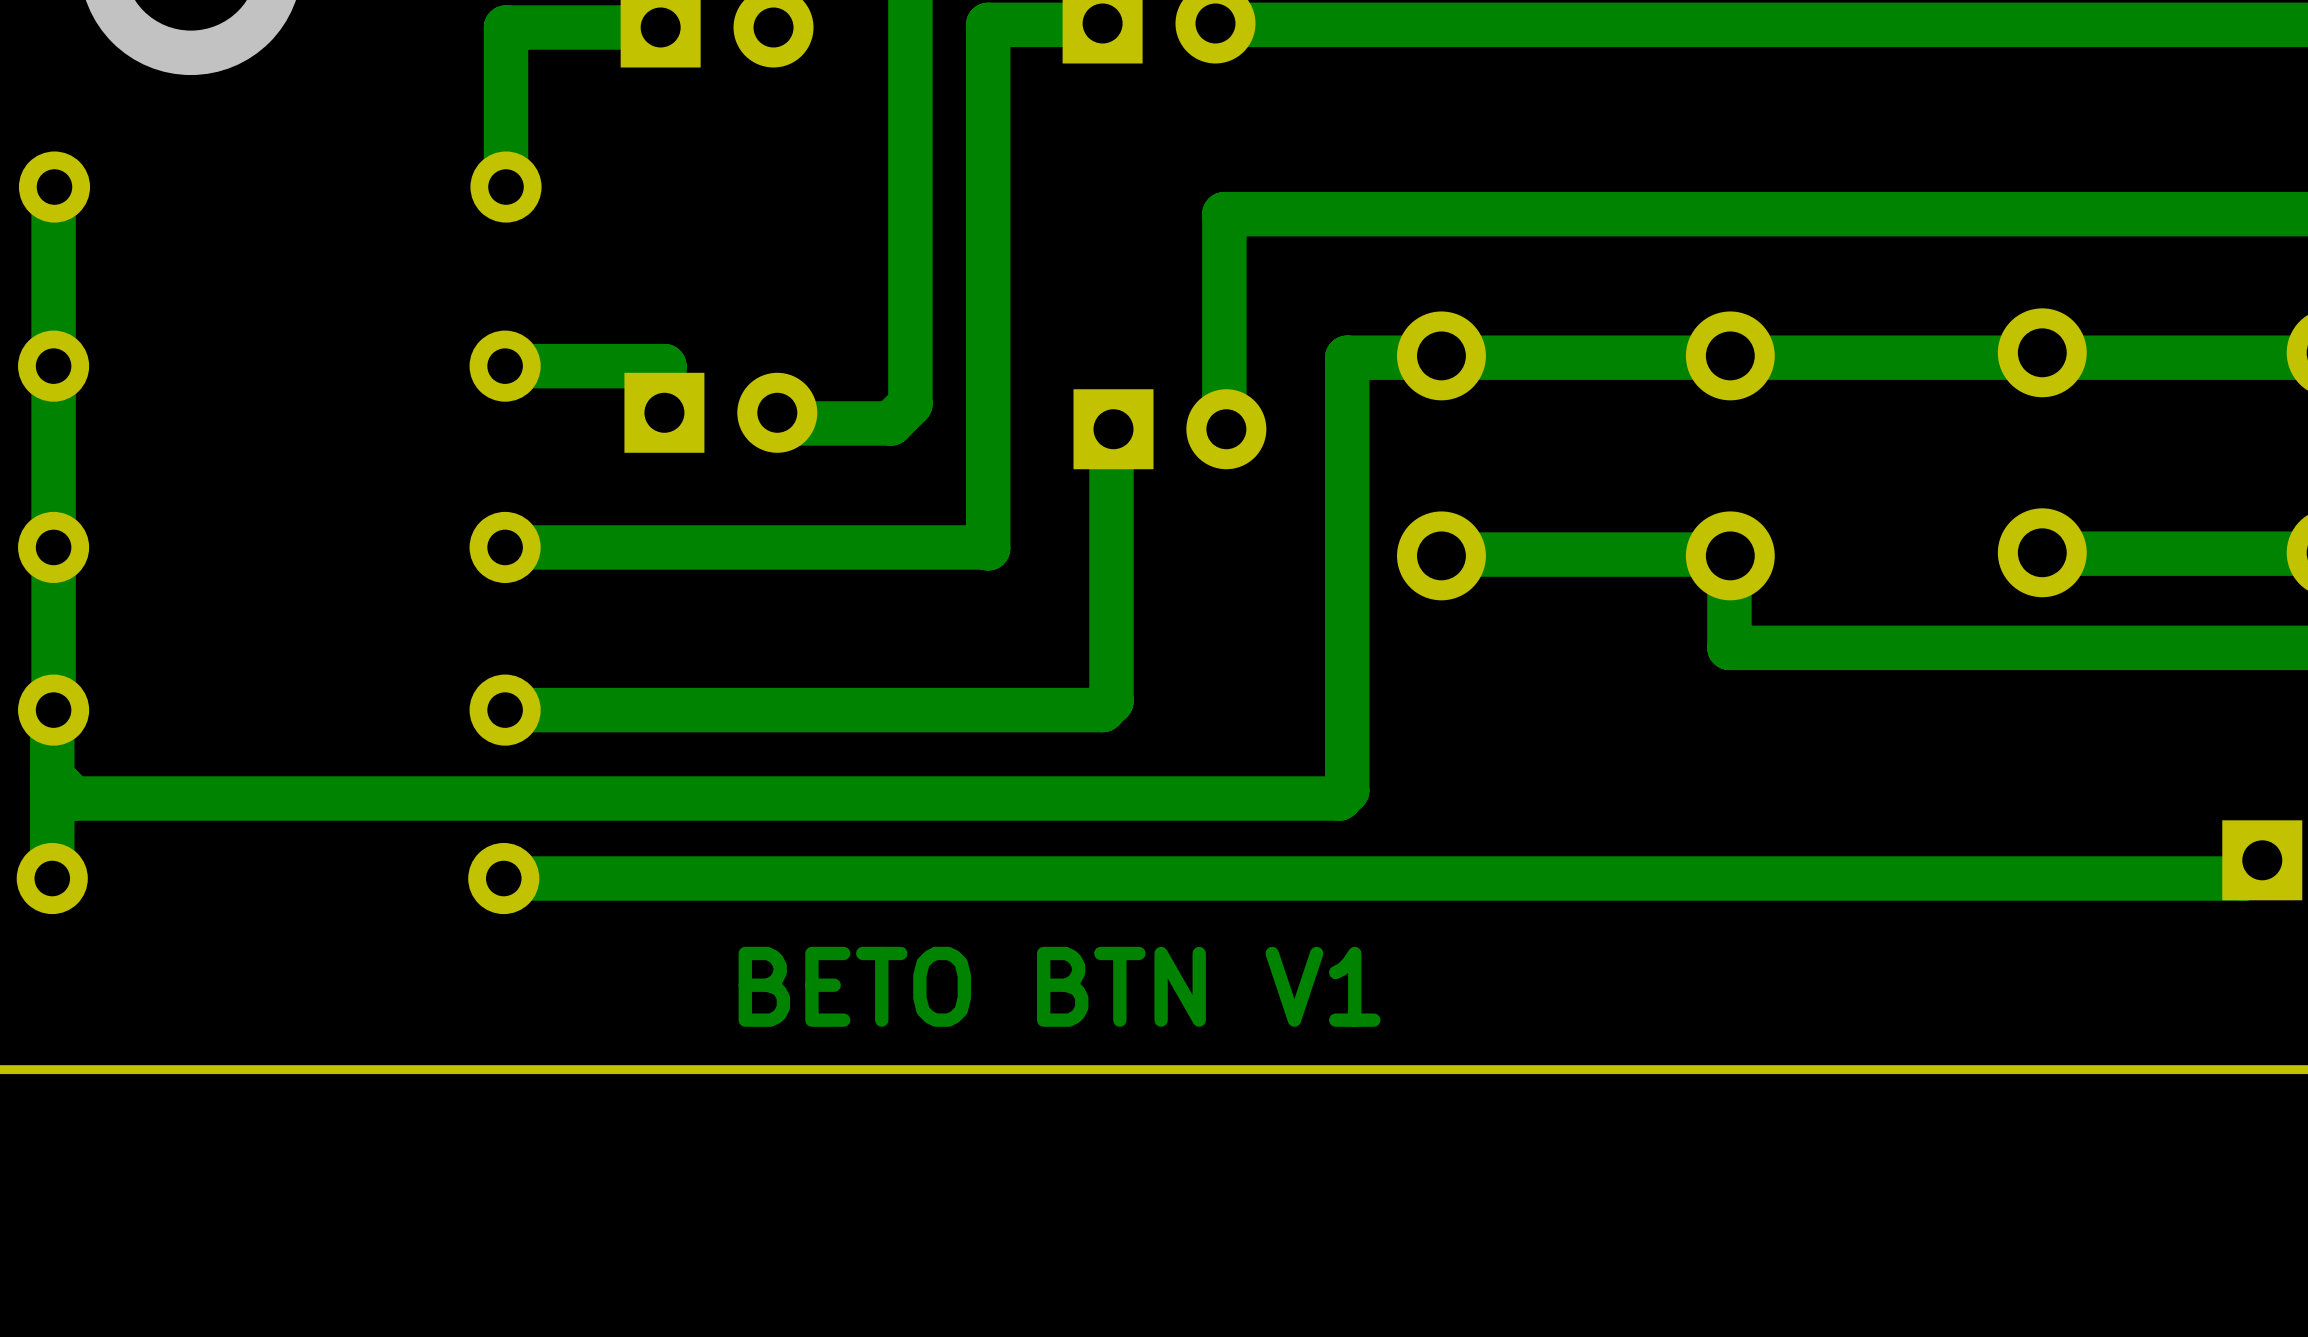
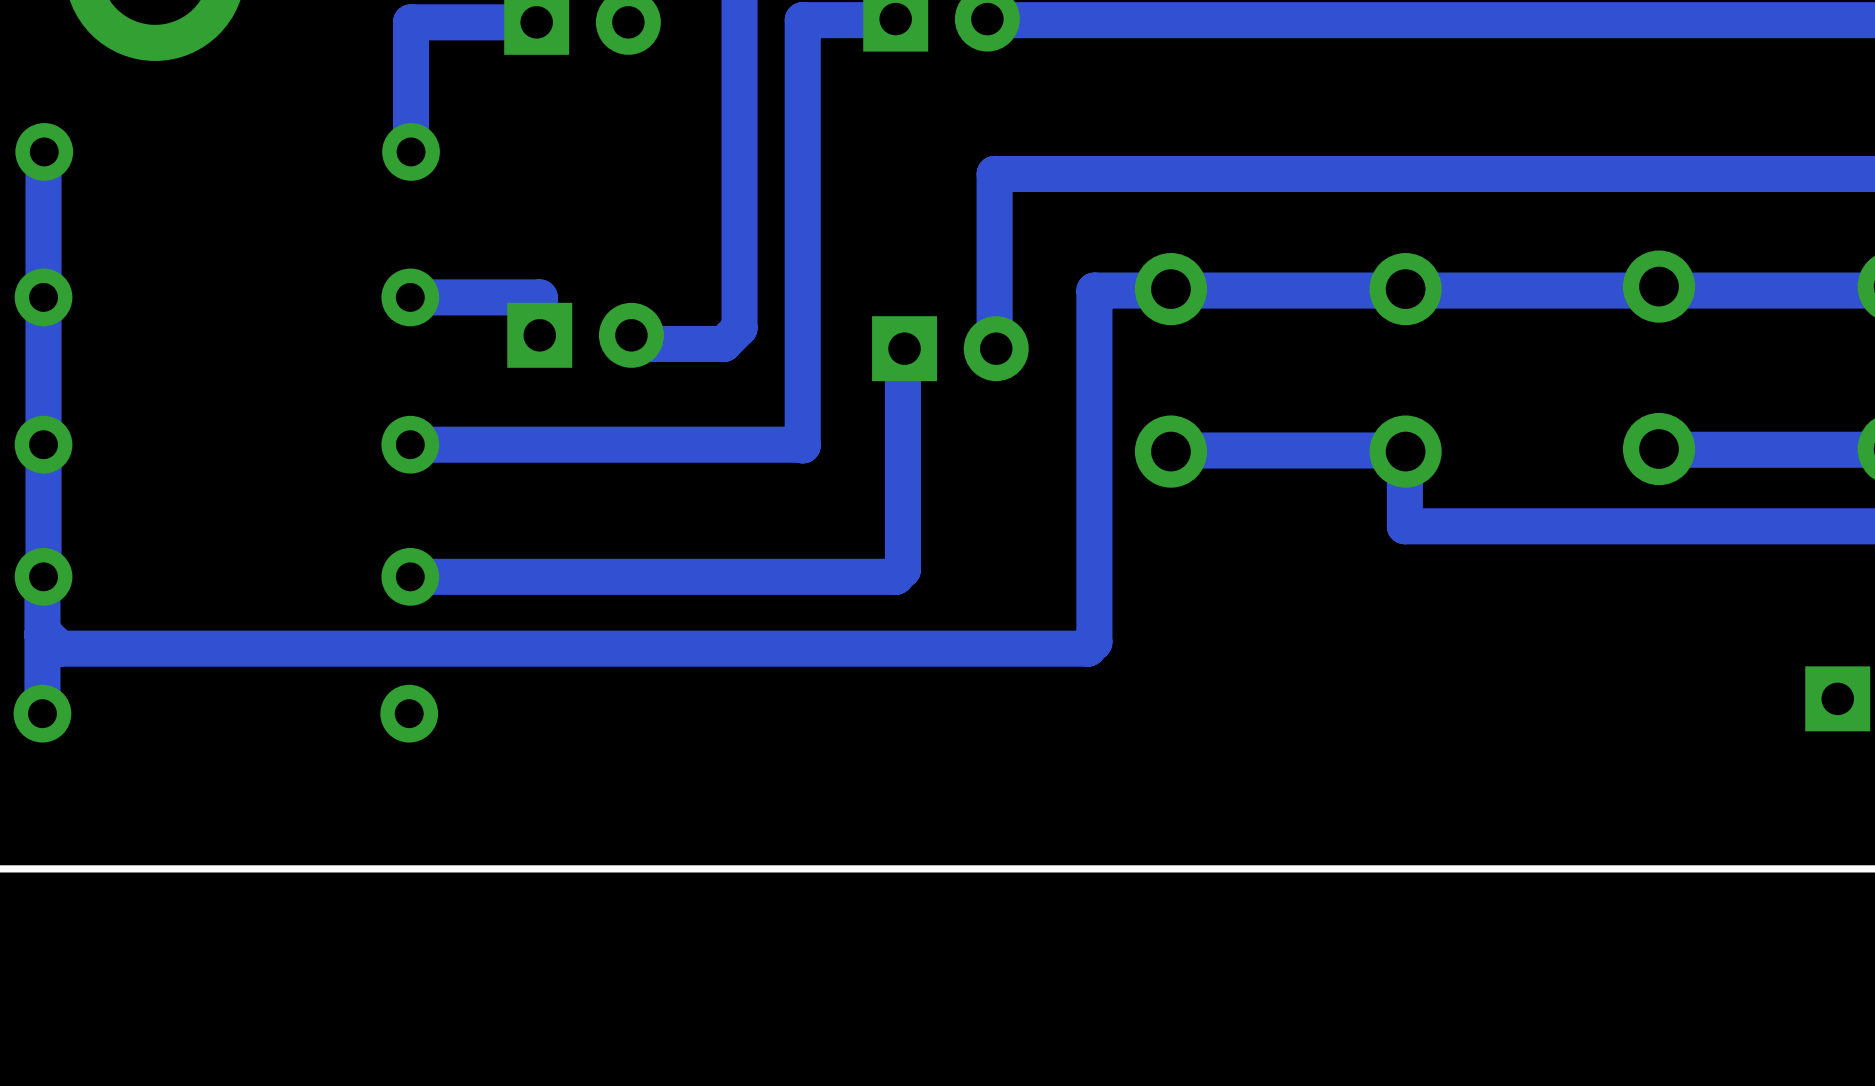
bottom track: (2262, 860) (2244, 878) (503, 878) -> none
text: BETO BTN V1 (1059, 986) -> none

